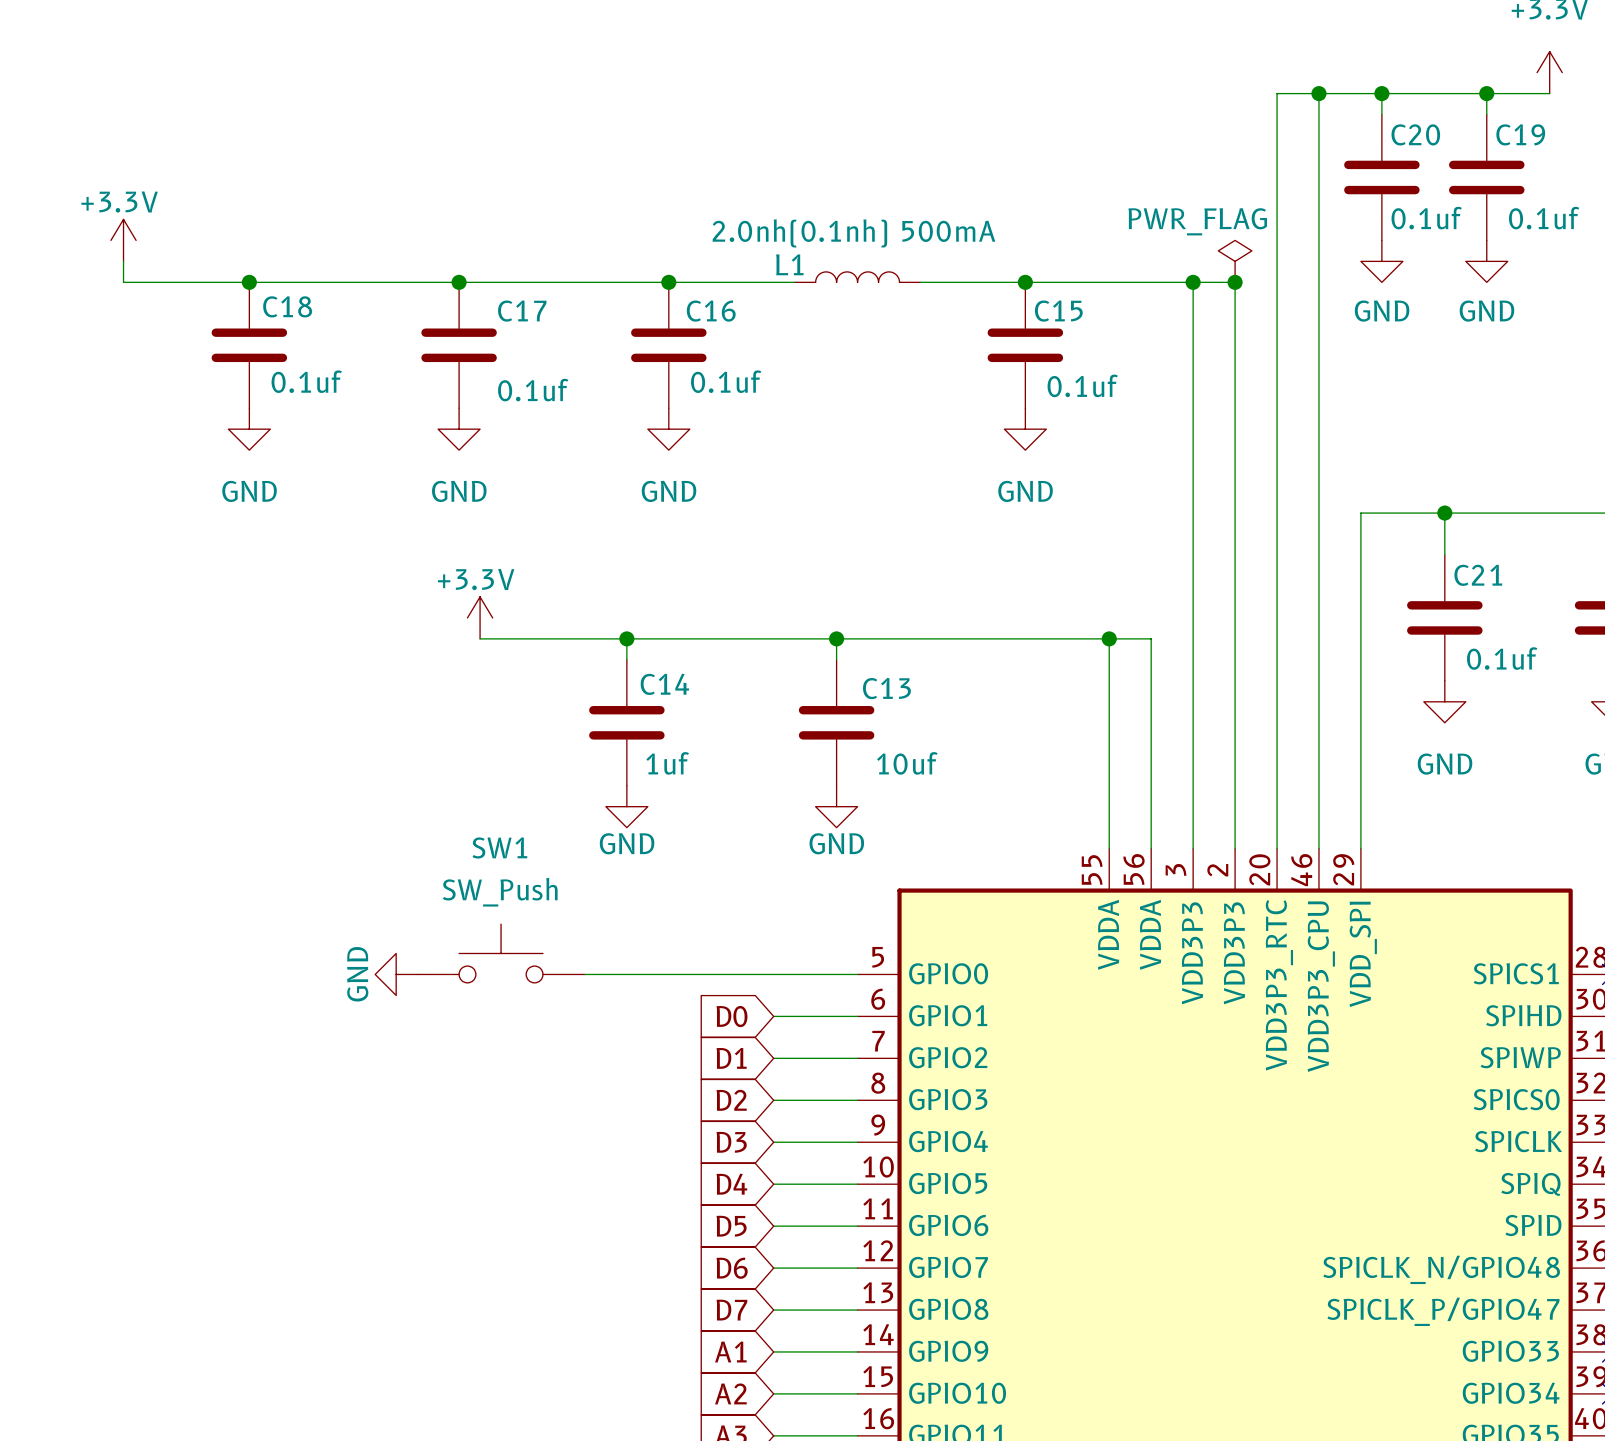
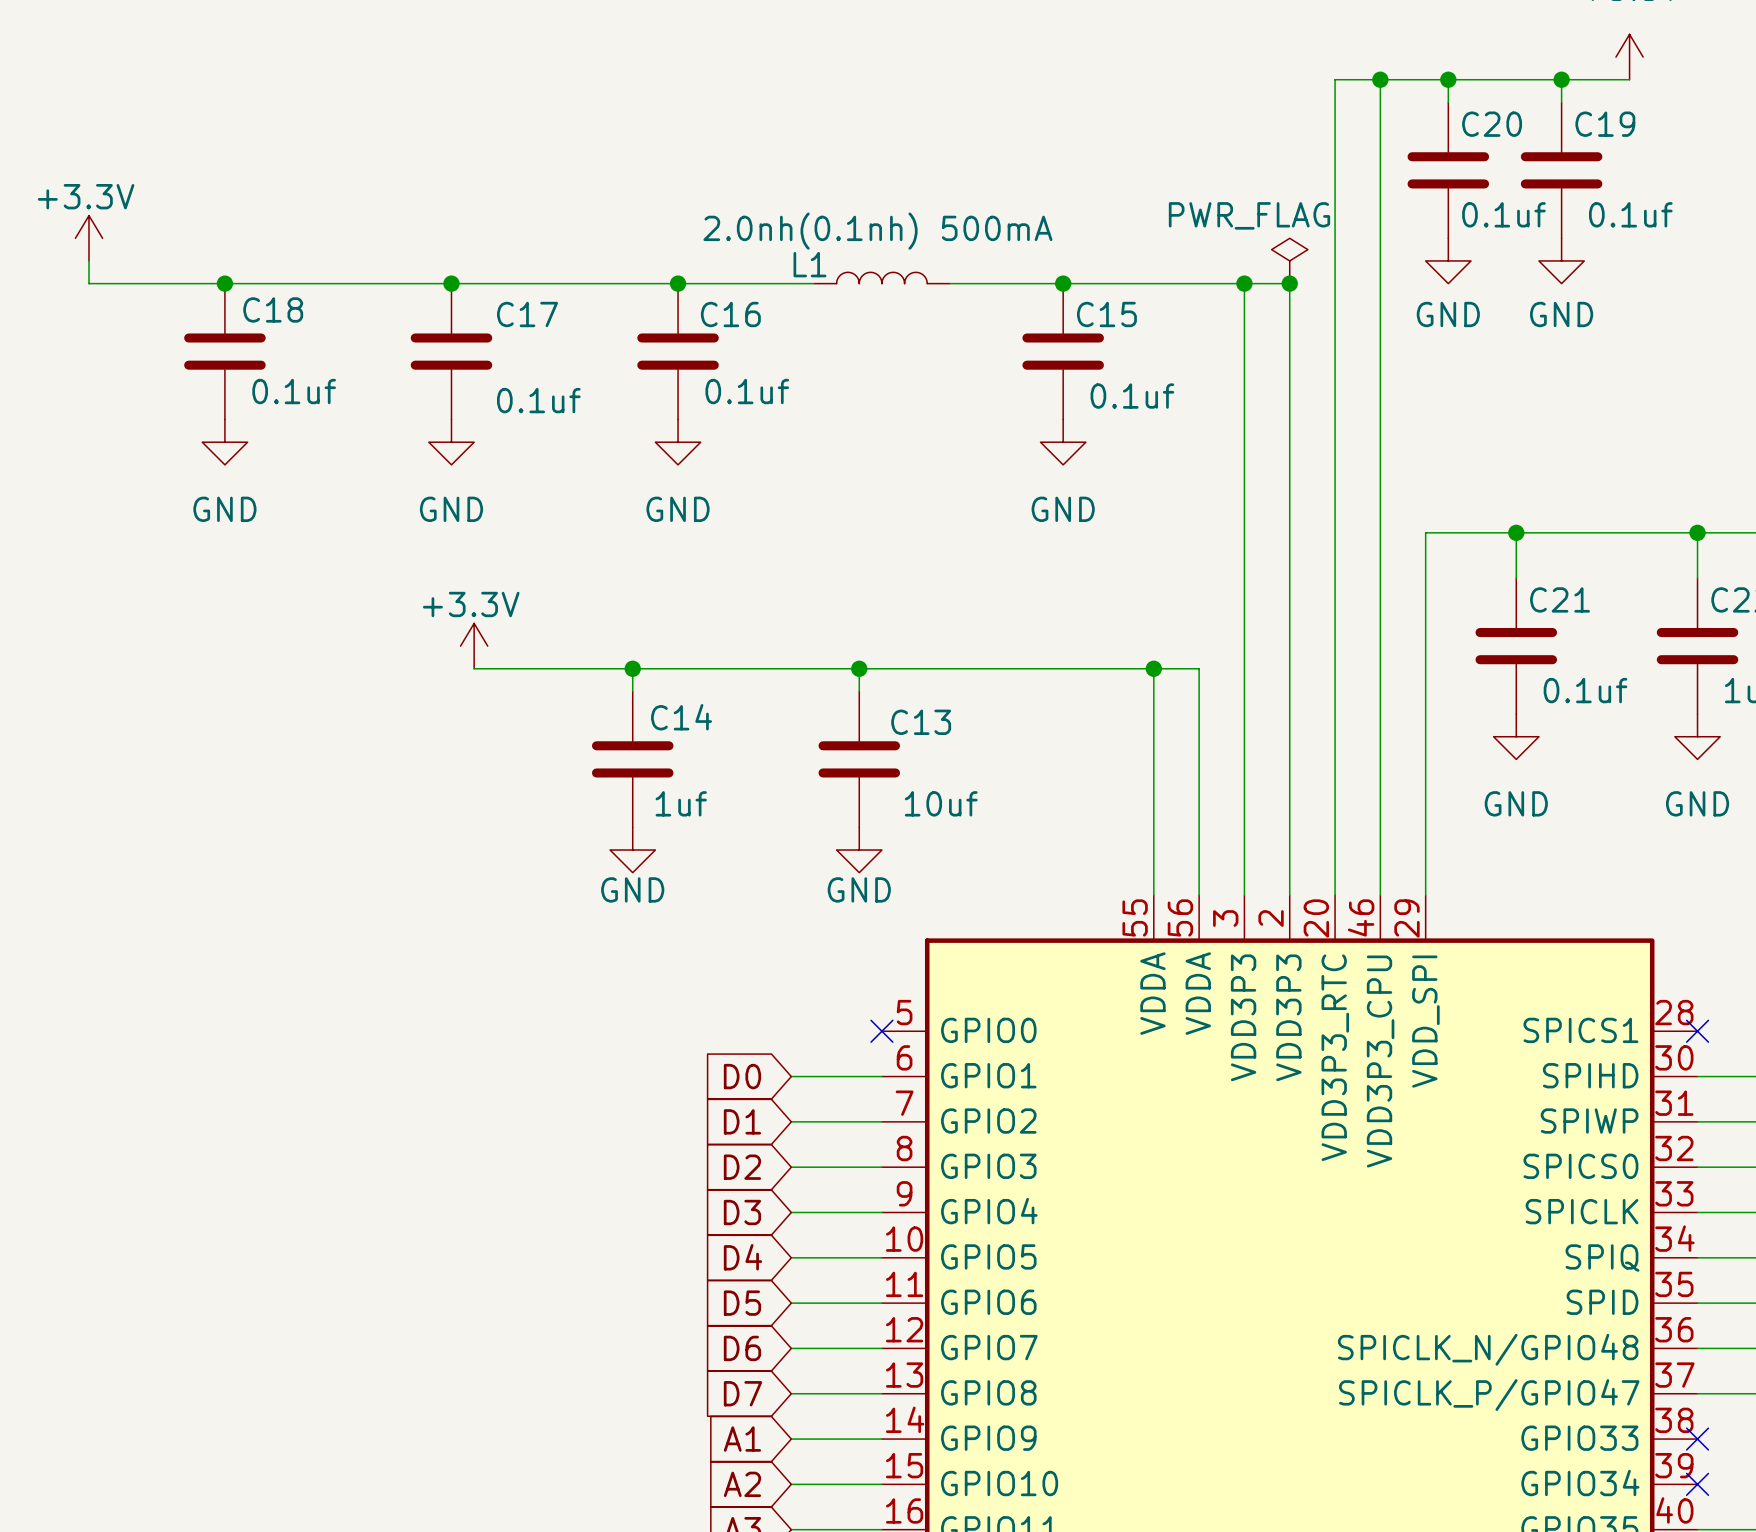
SW1: SW_Push (501, 953) -> none
power symbol: GND (396, 974) -> none
wire: (584, 974) (857, 974) -> none
no-connect mark: none -> (881, 1031)

